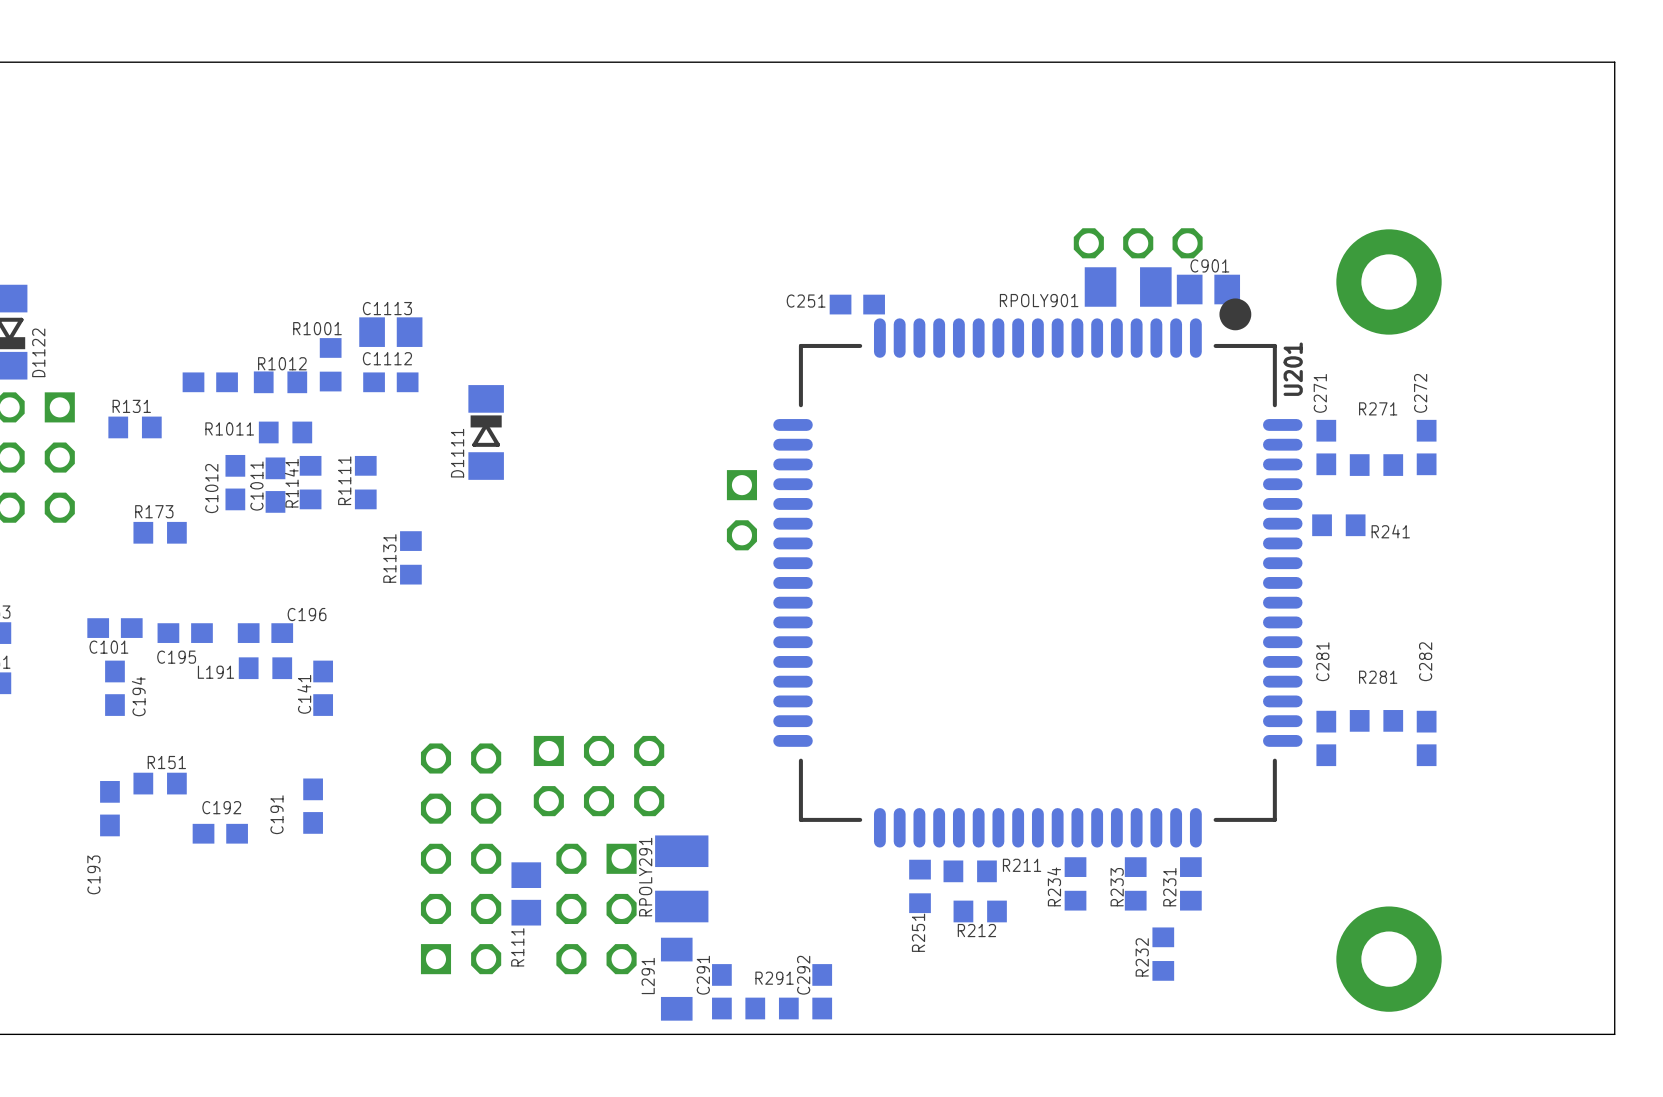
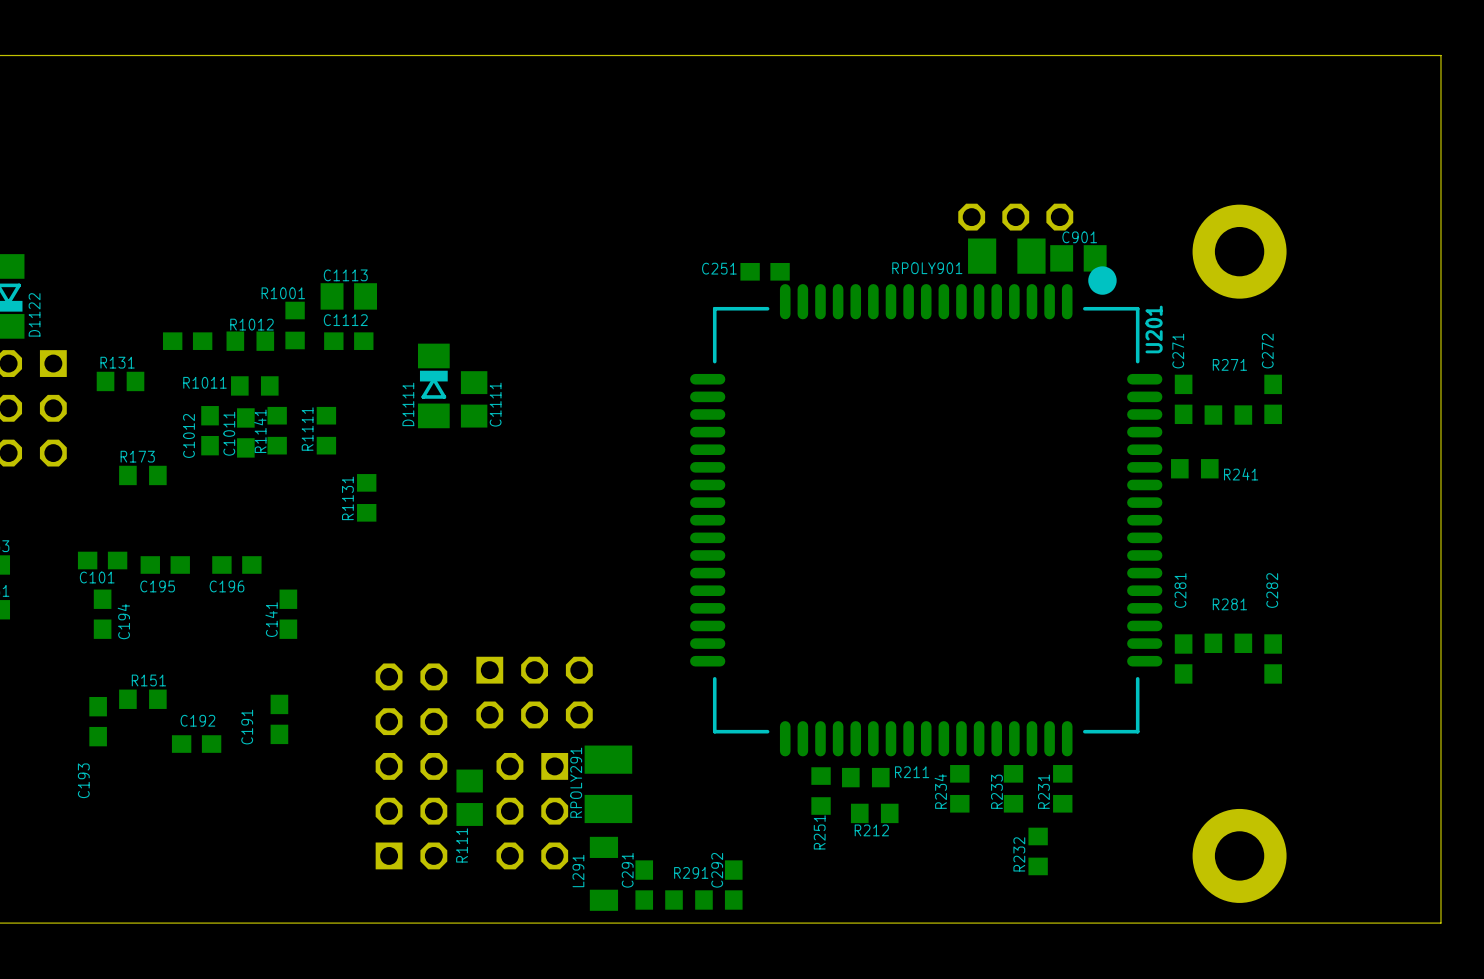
C1111: none -> (474, 399)
part: (741, 510) -> none
C196 name position: C196 (307, 614) -> C196 (227, 586)
L191: (265, 668) -> none

